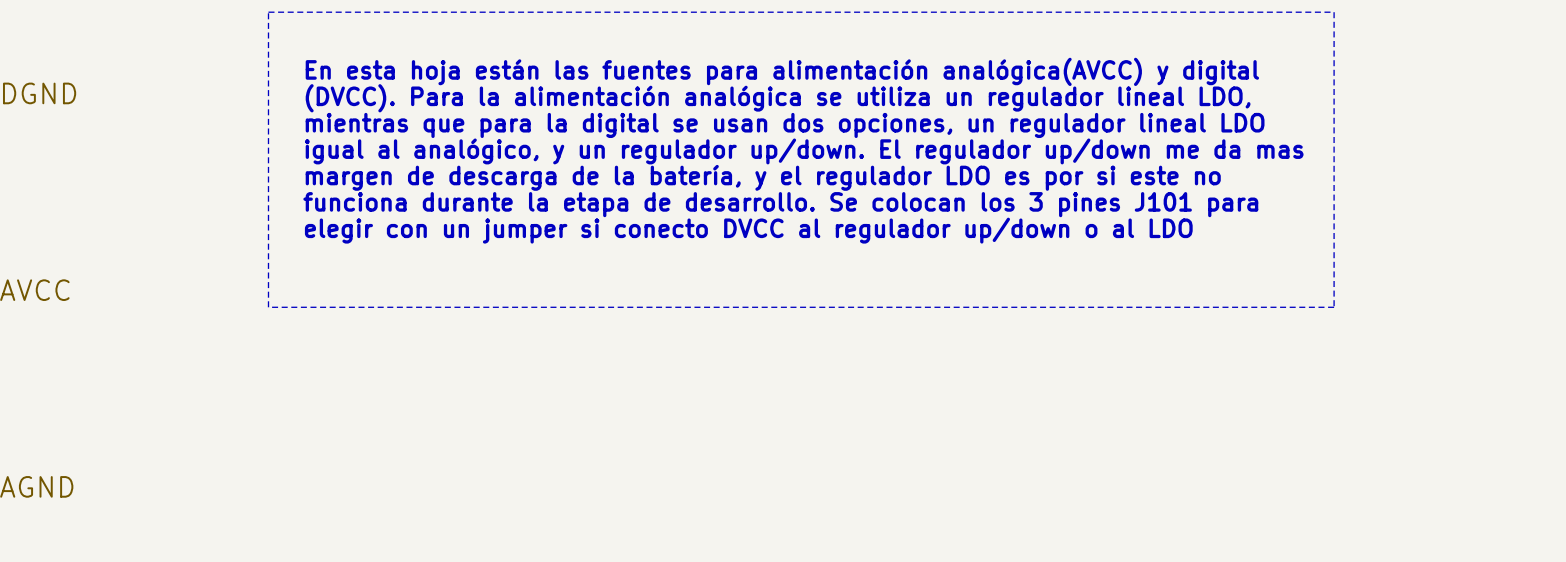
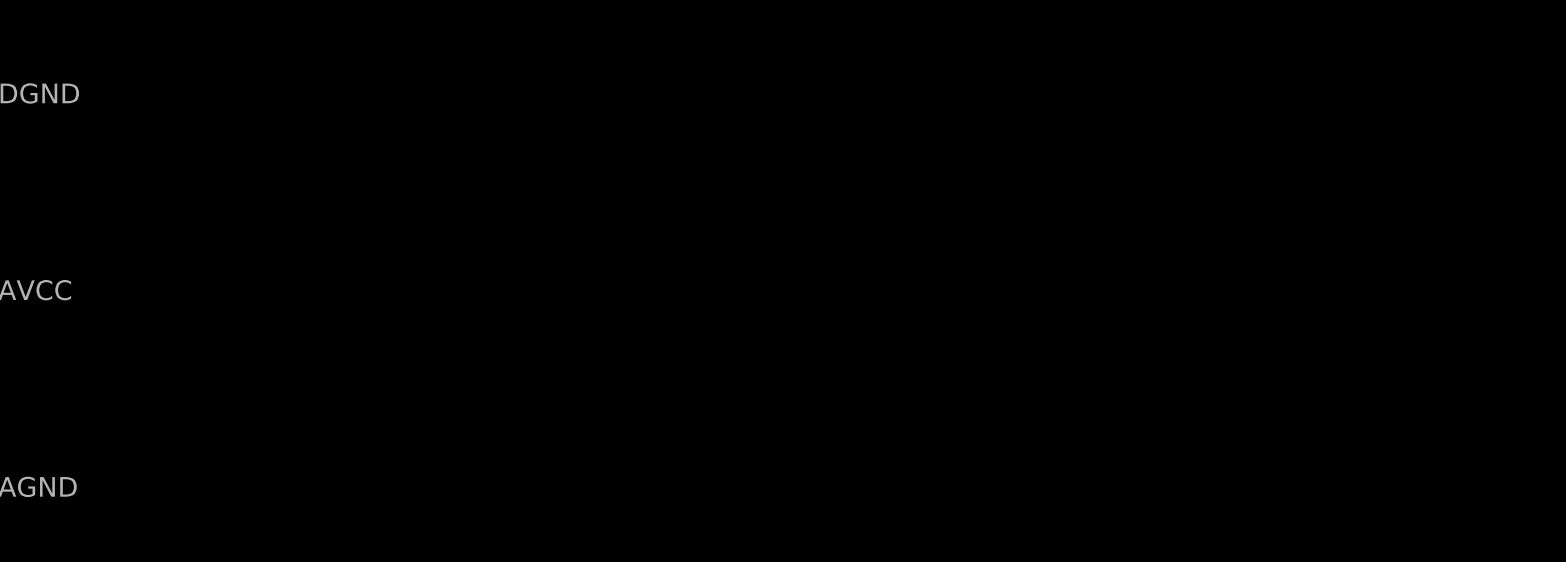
line: (268, 12) (1334, 12) (1334, 307) (268, 307) (268, 12) -> none
text: En esta hoja están las fuentes para alimentación analógica(AVCC) y digital (782, 71) -> none
text: (DVCC). Para la alimentación analógica se utiliza un regulador lineal LDO, (778, 98) -> none
text: mientras que para la digital se usan dos opciones, un regulador lineal LDO (785, 125) -> none
text: igual al analógico, y un regulador up/down. El regulador up/down me da mas (804, 151) -> none
text: margen de descarga de la batería, y el regulador LDO es por si este no (763, 177) -> none
text: funciona durante la etapa de desarrollo. Se colocan los 3 pines J101 para (780, 204) -> none
text: elegir con un jumper si conecto DVCC al regulador up/down o al LDO (748, 230) -> none

